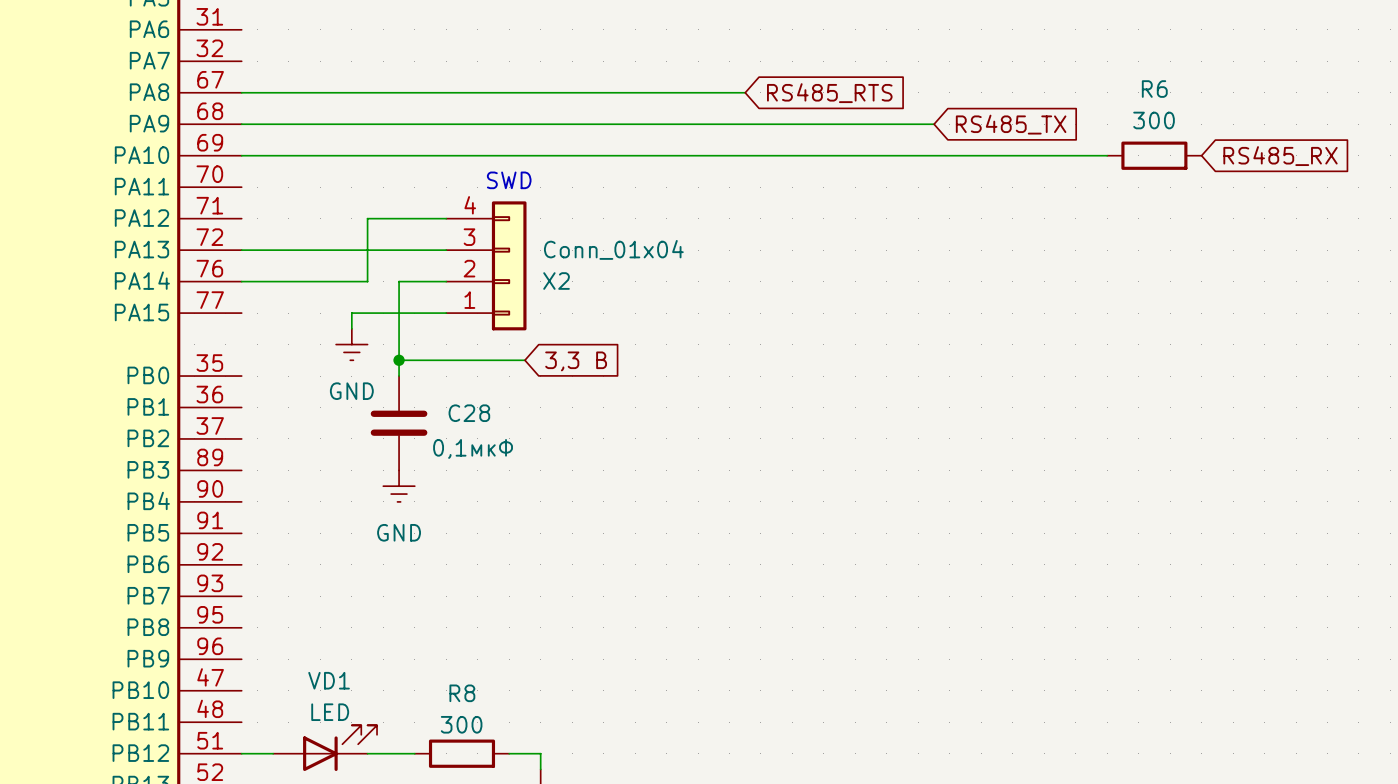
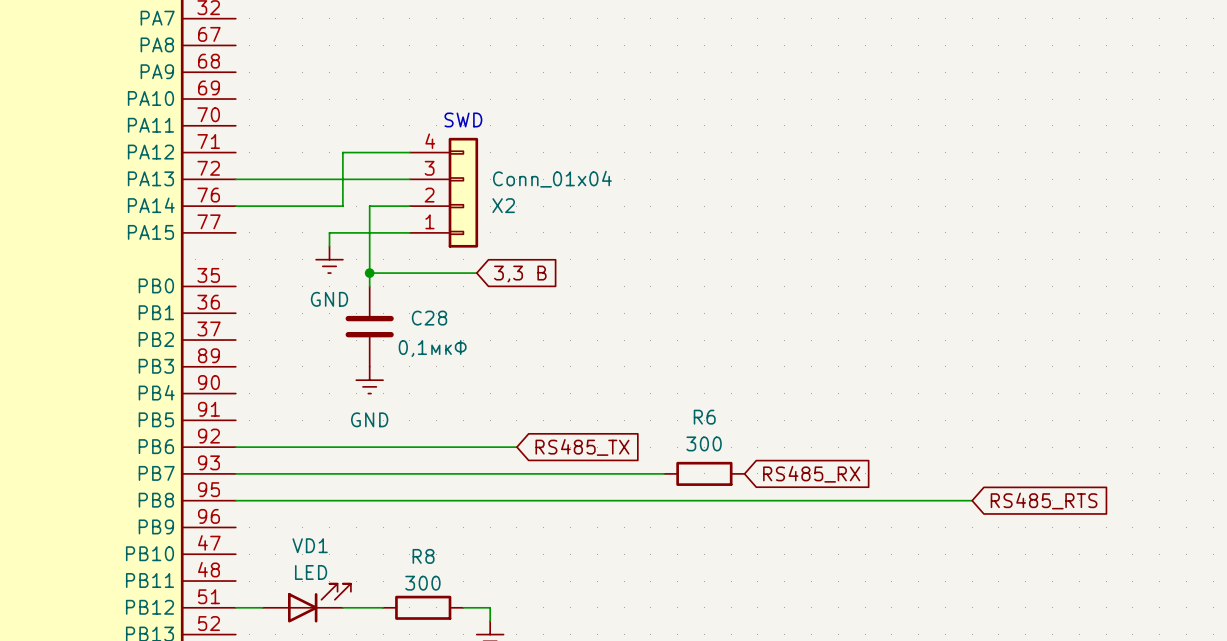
wire: (241, 92) (745, 92) -> none
global label: RS485_RTS (829, 93) -> none
wire: (241, 124) (934, 124) -> none
global label: RS485_TX (1011, 124) -> none
wire: (241, 155) (1107, 155) -> none
R6 position: (1154, 155) -> (704, 473)
global label: RS485_RX (1280, 156) -> none
wire: none -> (235, 447) (516, 447)
global label: none -> RS485_TX (582, 447)
wire: none -> (235, 473) (664, 473)
global label: none -> RS485_RX (811, 474)
wire: none -> (235, 500) (972, 500)
global label: none -> RS485_RTS (1044, 501)

